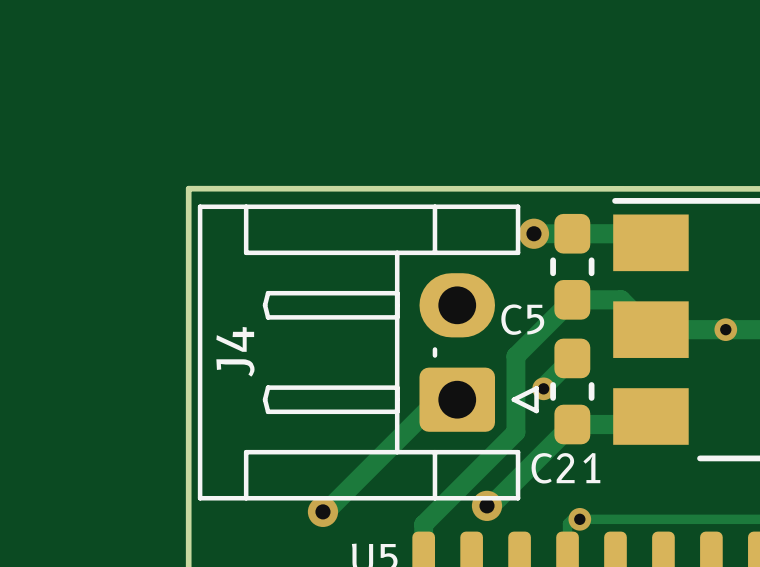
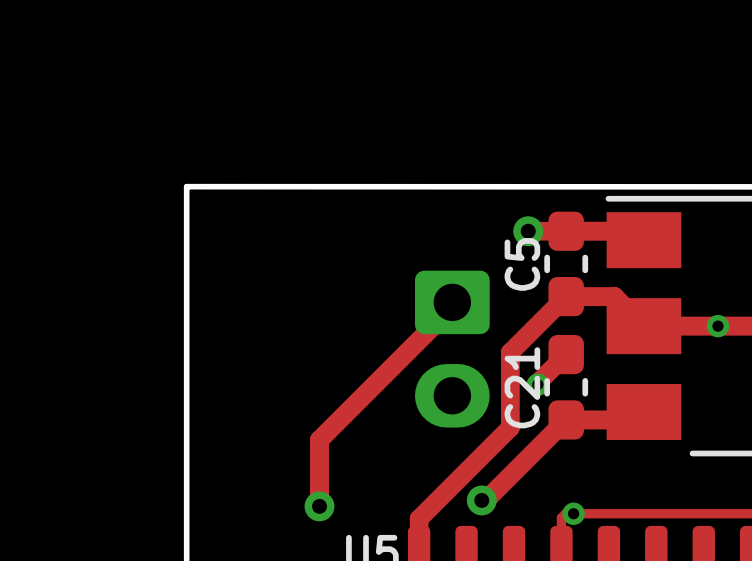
C5 name rotation: 0° (522, 319) -> 90° counterclockwise (522, 264)
J4 side: top (368, 352) -> bottom (452, 349)
track: (457, 399) (438, 399) (325, 511) (322, 511) -> (452, 307) (319, 439) (319, 506)
C21 name rotation: 0° (565, 468) -> 90° counterclockwise (522, 387)

